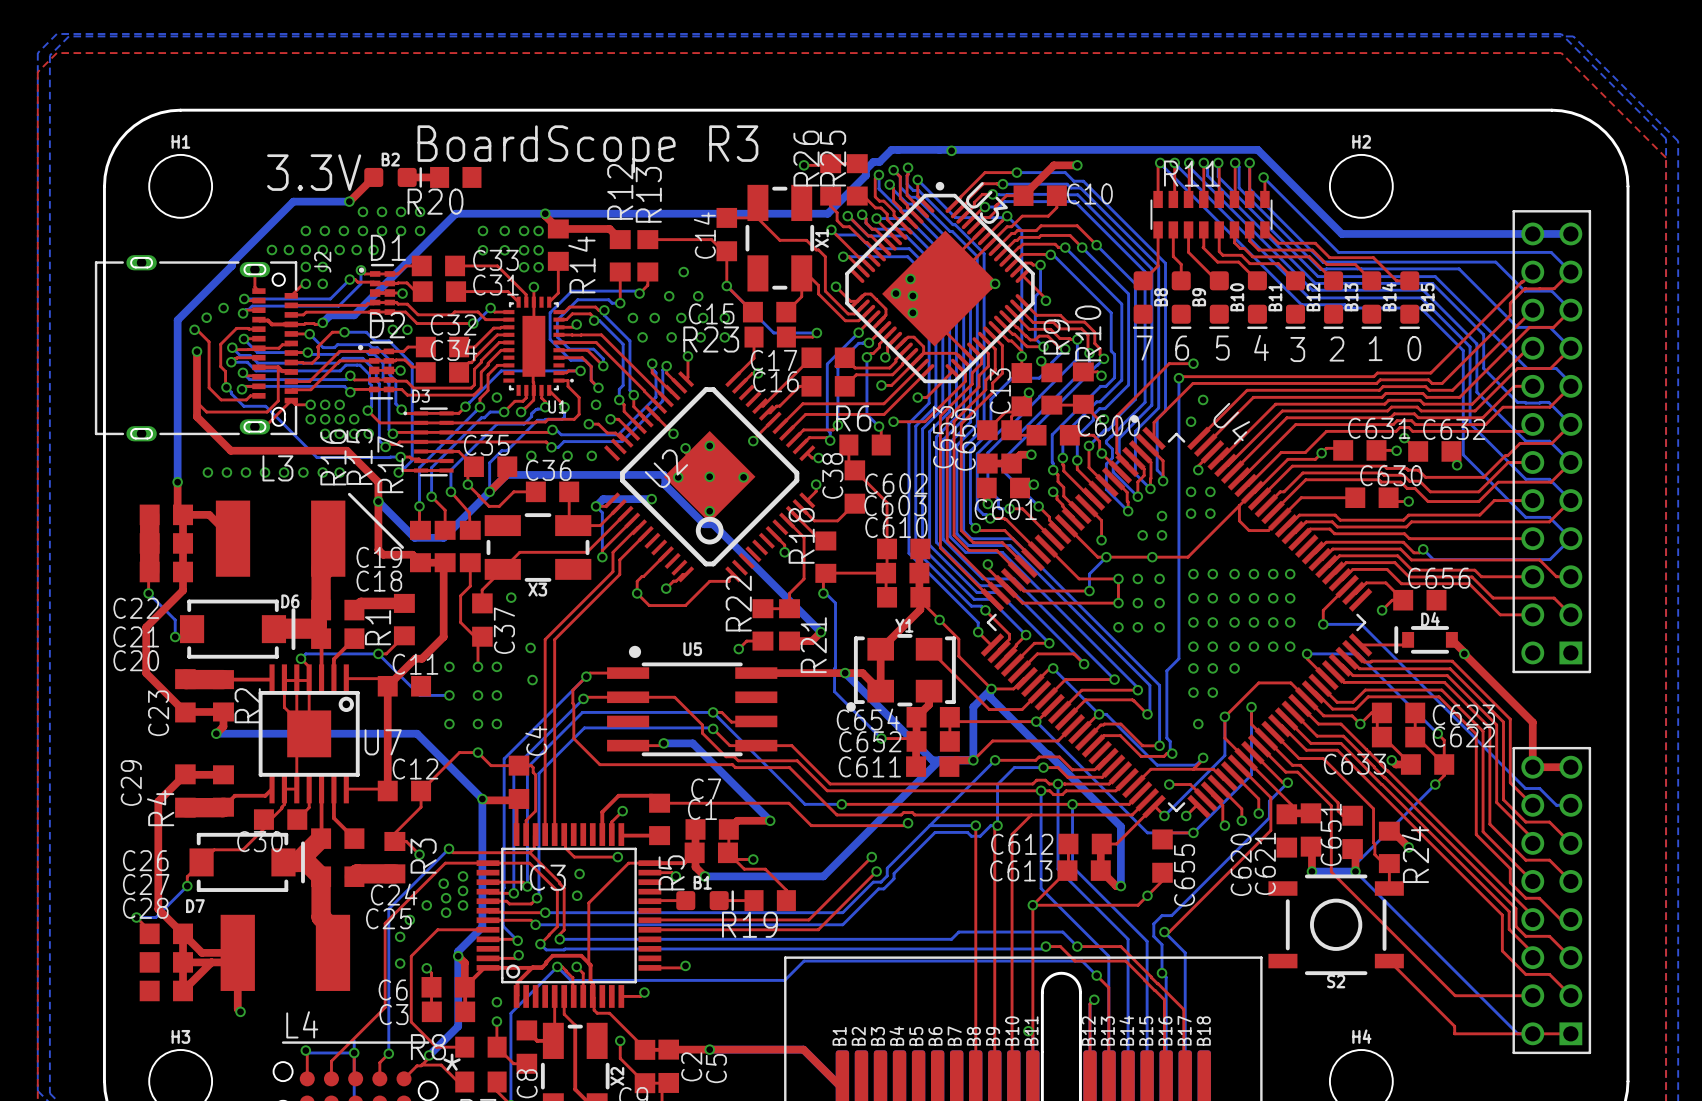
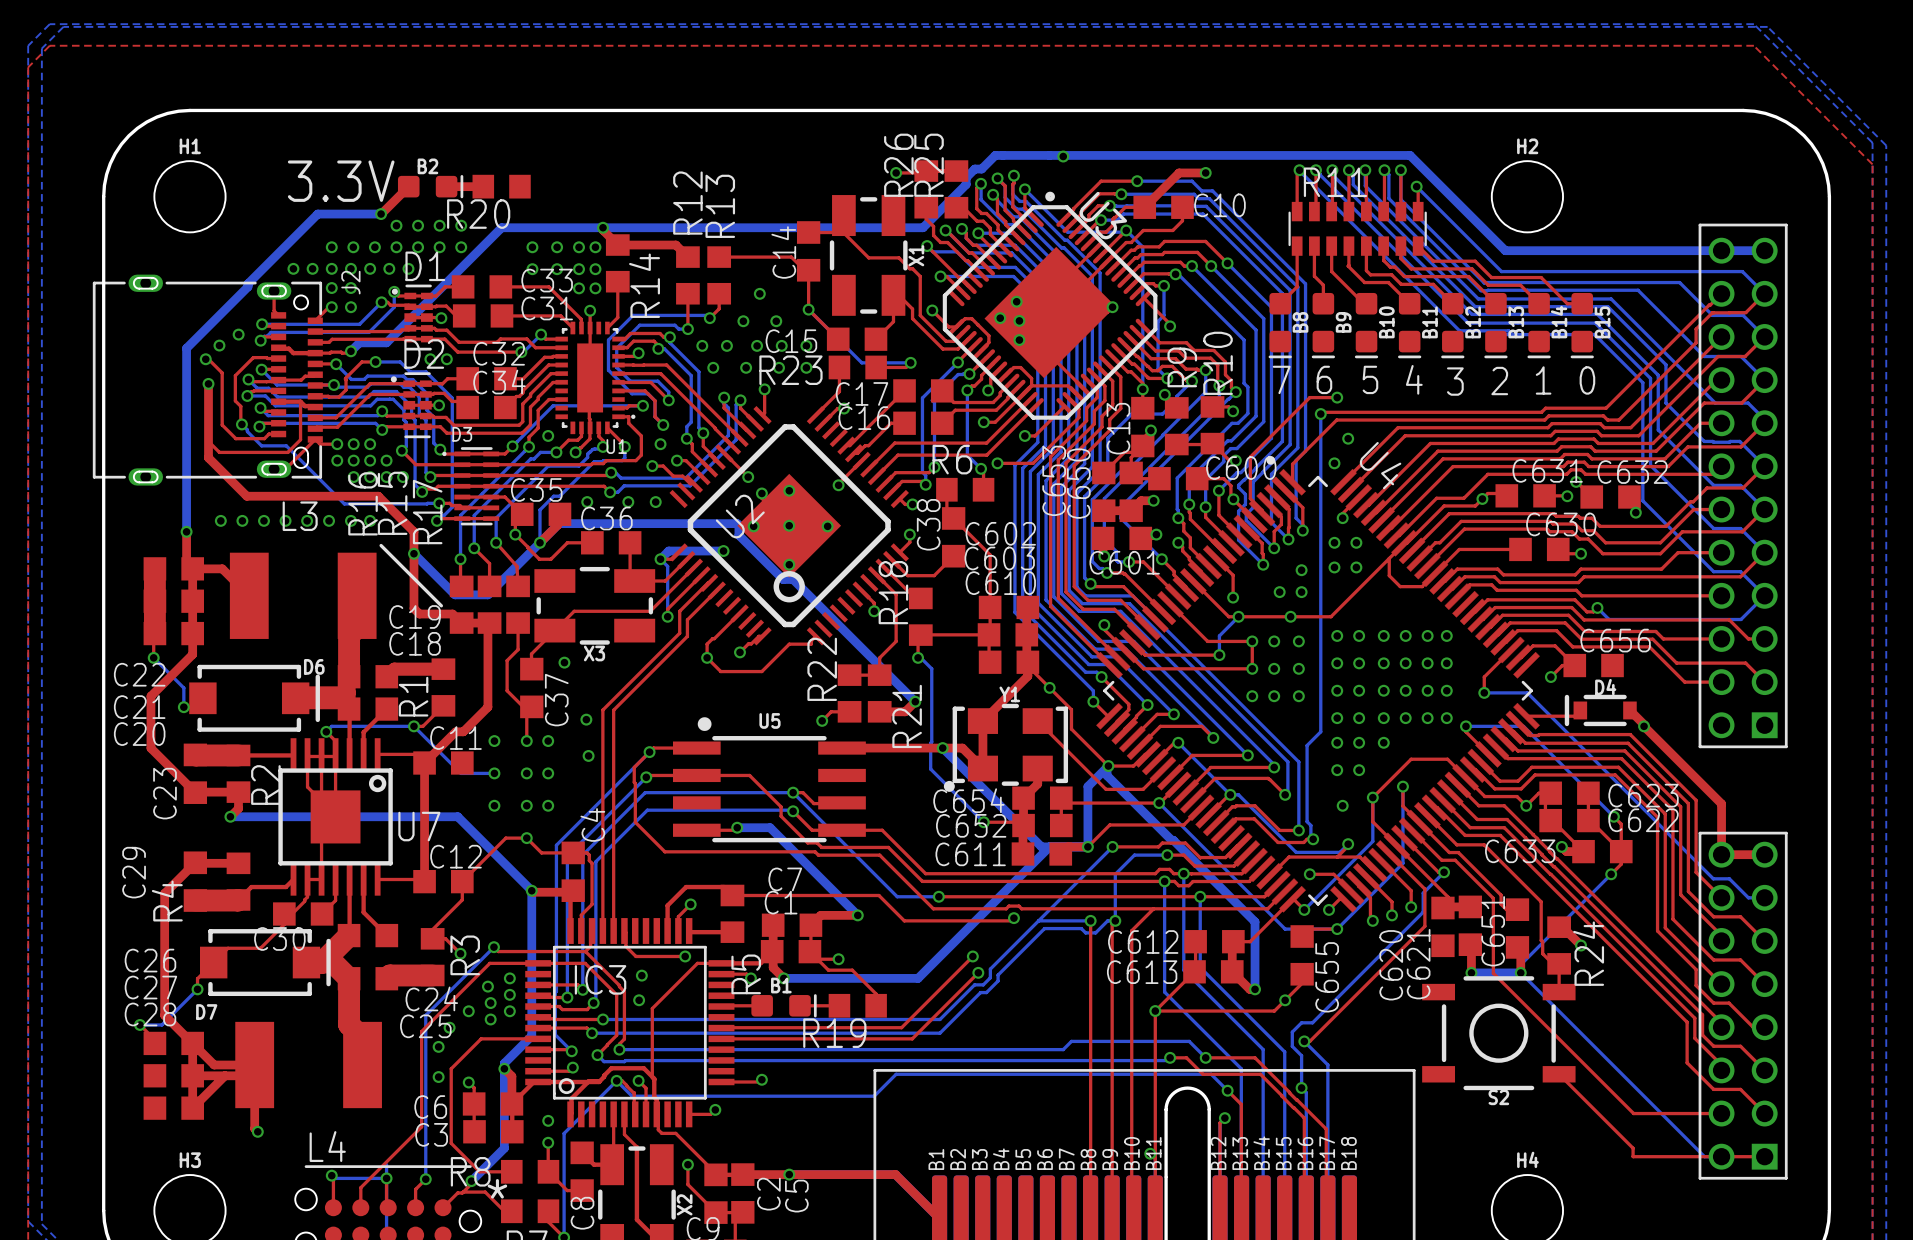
text: BoardScope R3 (587, 149) -> none

